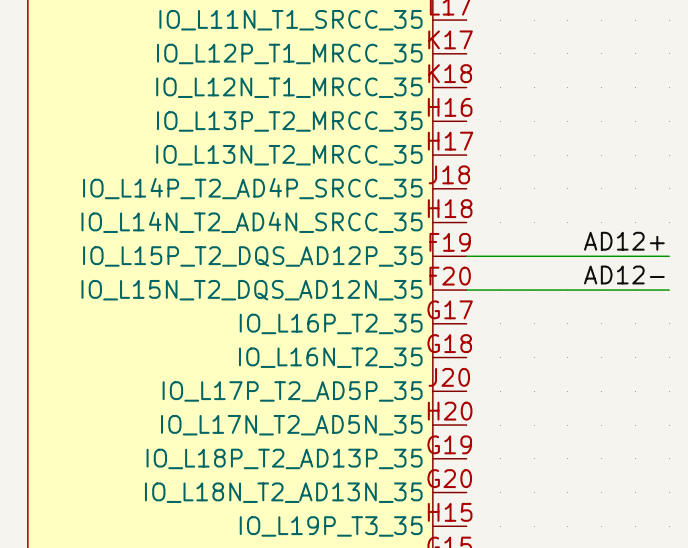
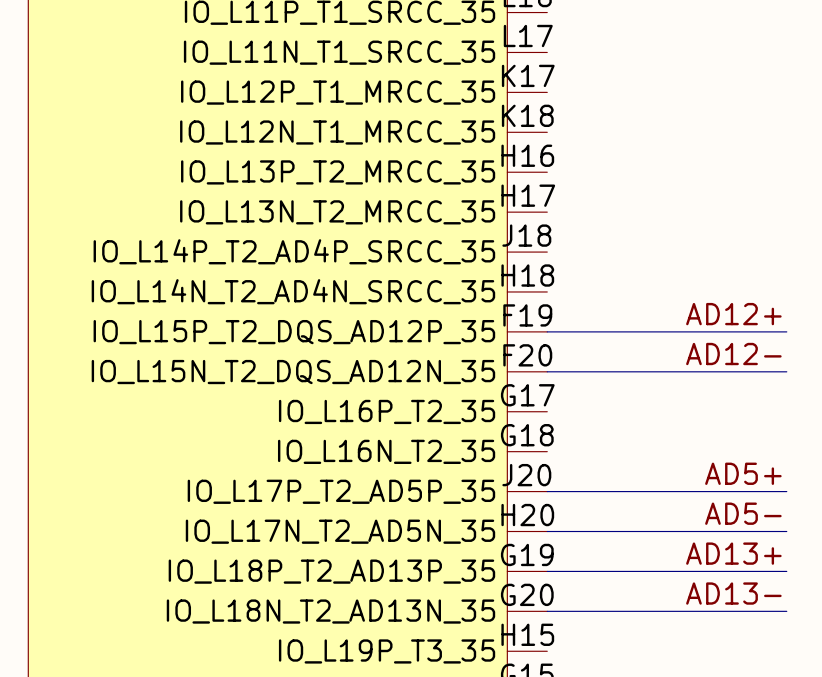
label: none -> AD5+ (743, 473)
wire: none -> (547, 491) (786, 491)
label: none -> AD5- (743, 513)
wire: none -> (547, 531) (786, 531)
label: none -> AD13+ (733, 553)
wire: none -> (547, 571) (786, 571)
label: none -> AD13- (733, 593)
wire: none -> (547, 611) (786, 611)

